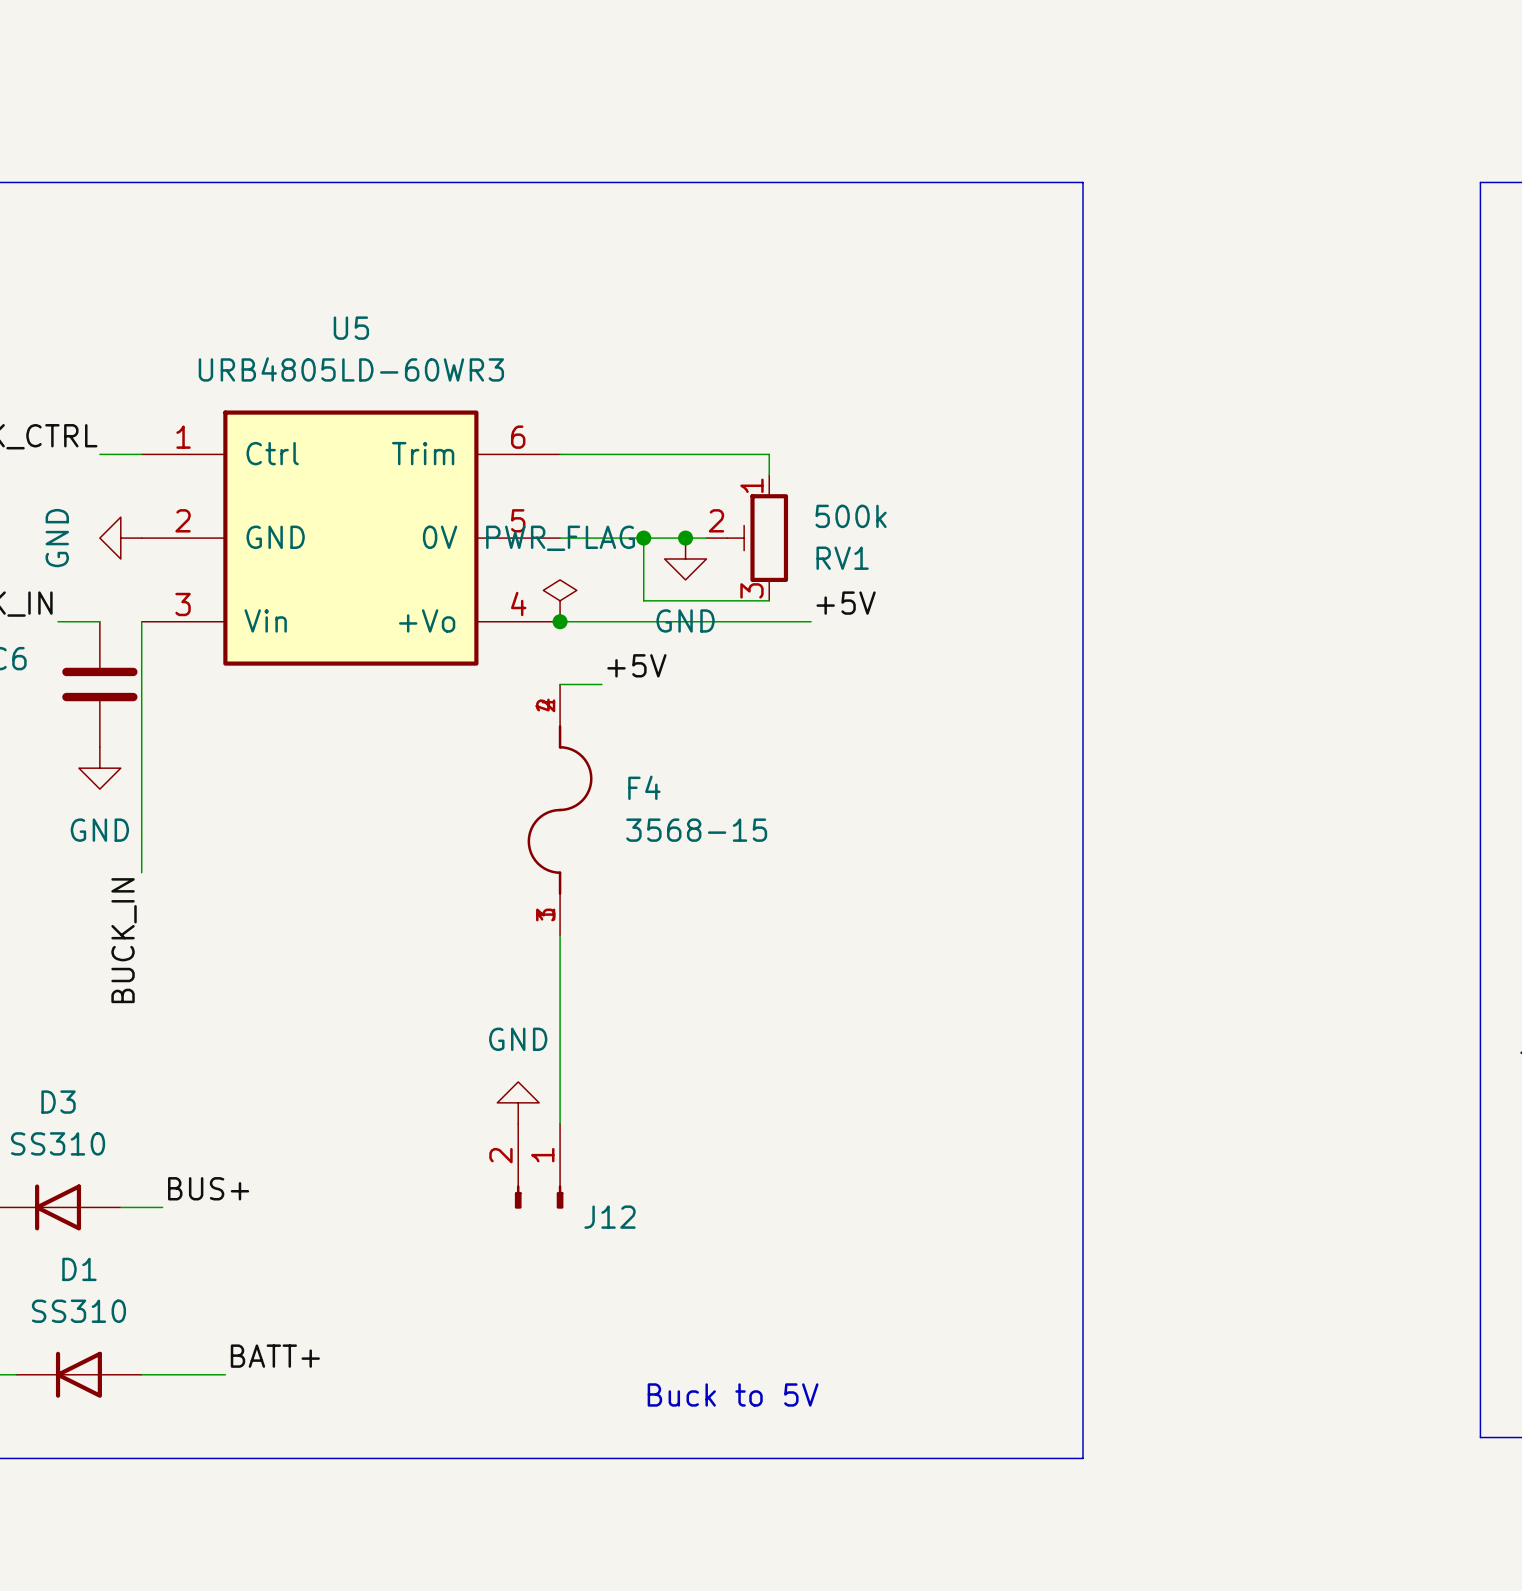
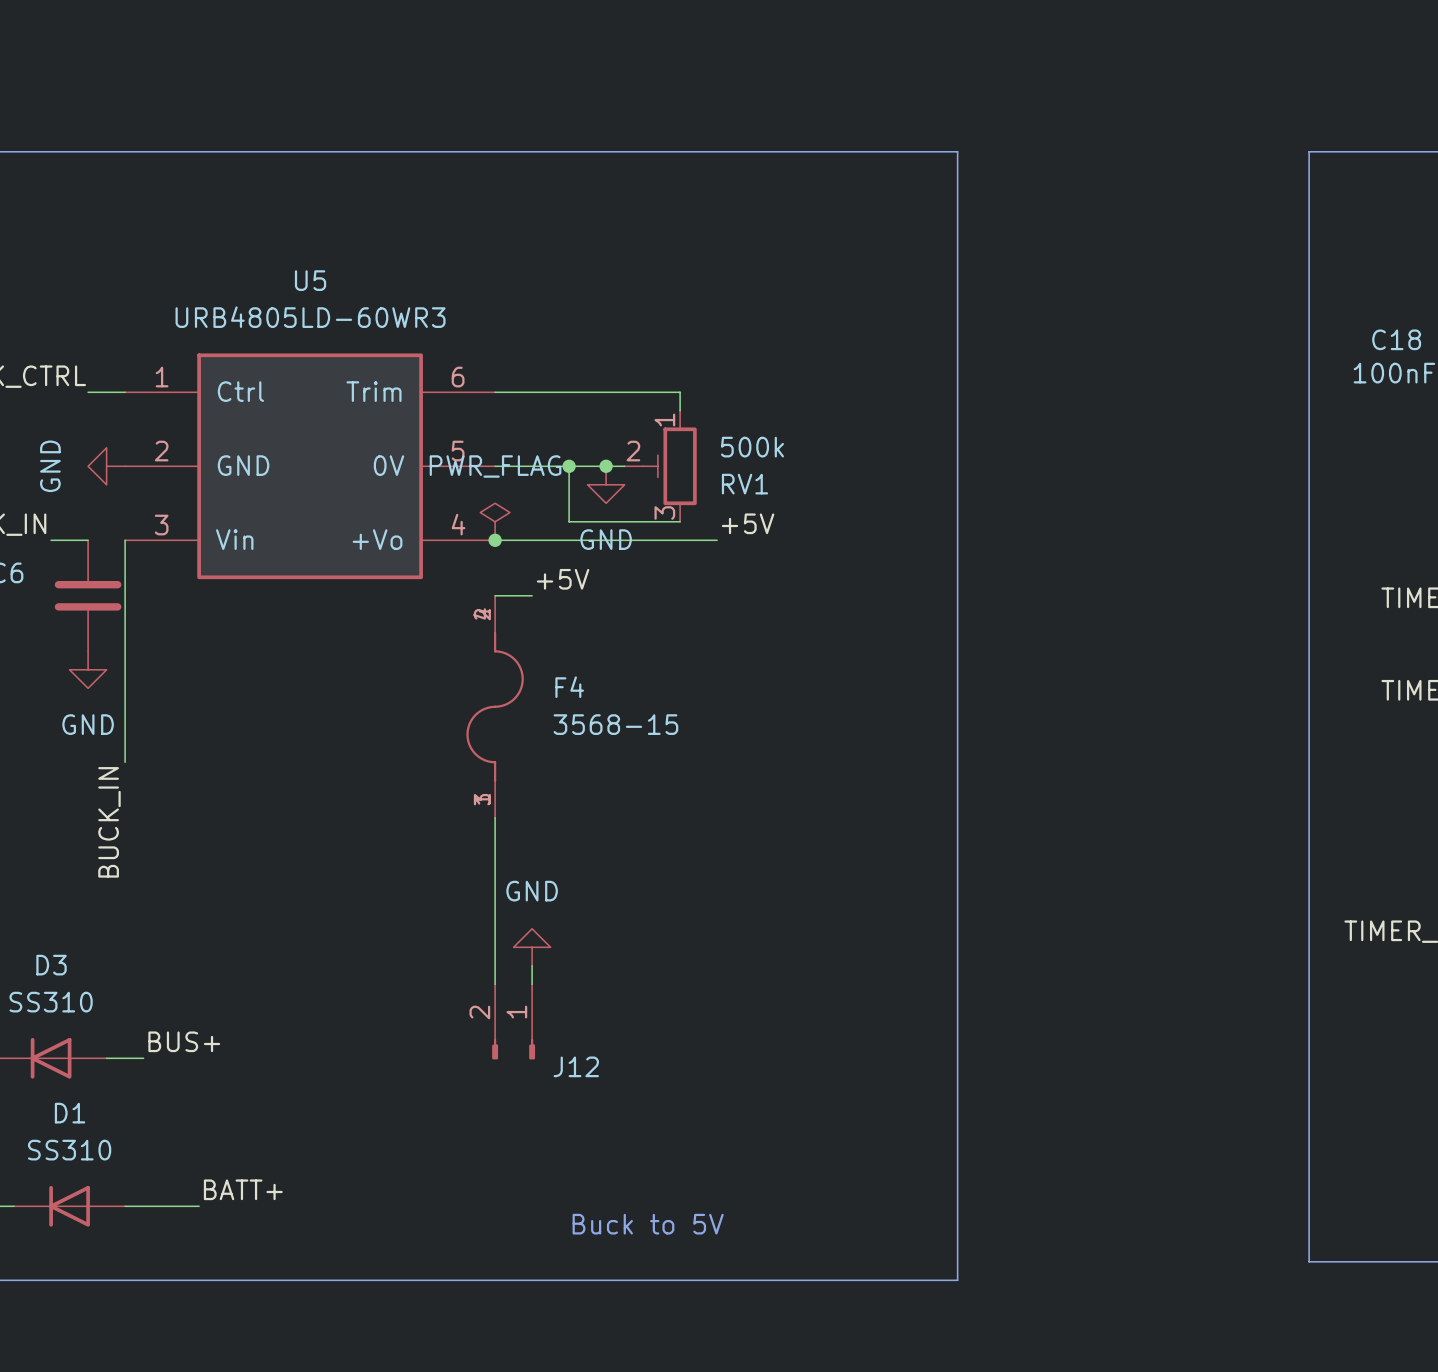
power symbol position: GND (518, 1102) -> GND (532, 947)
wire: none -> (532, 965) (532, 984)
J12 position: (539, 1166) -> (513, 1021)

